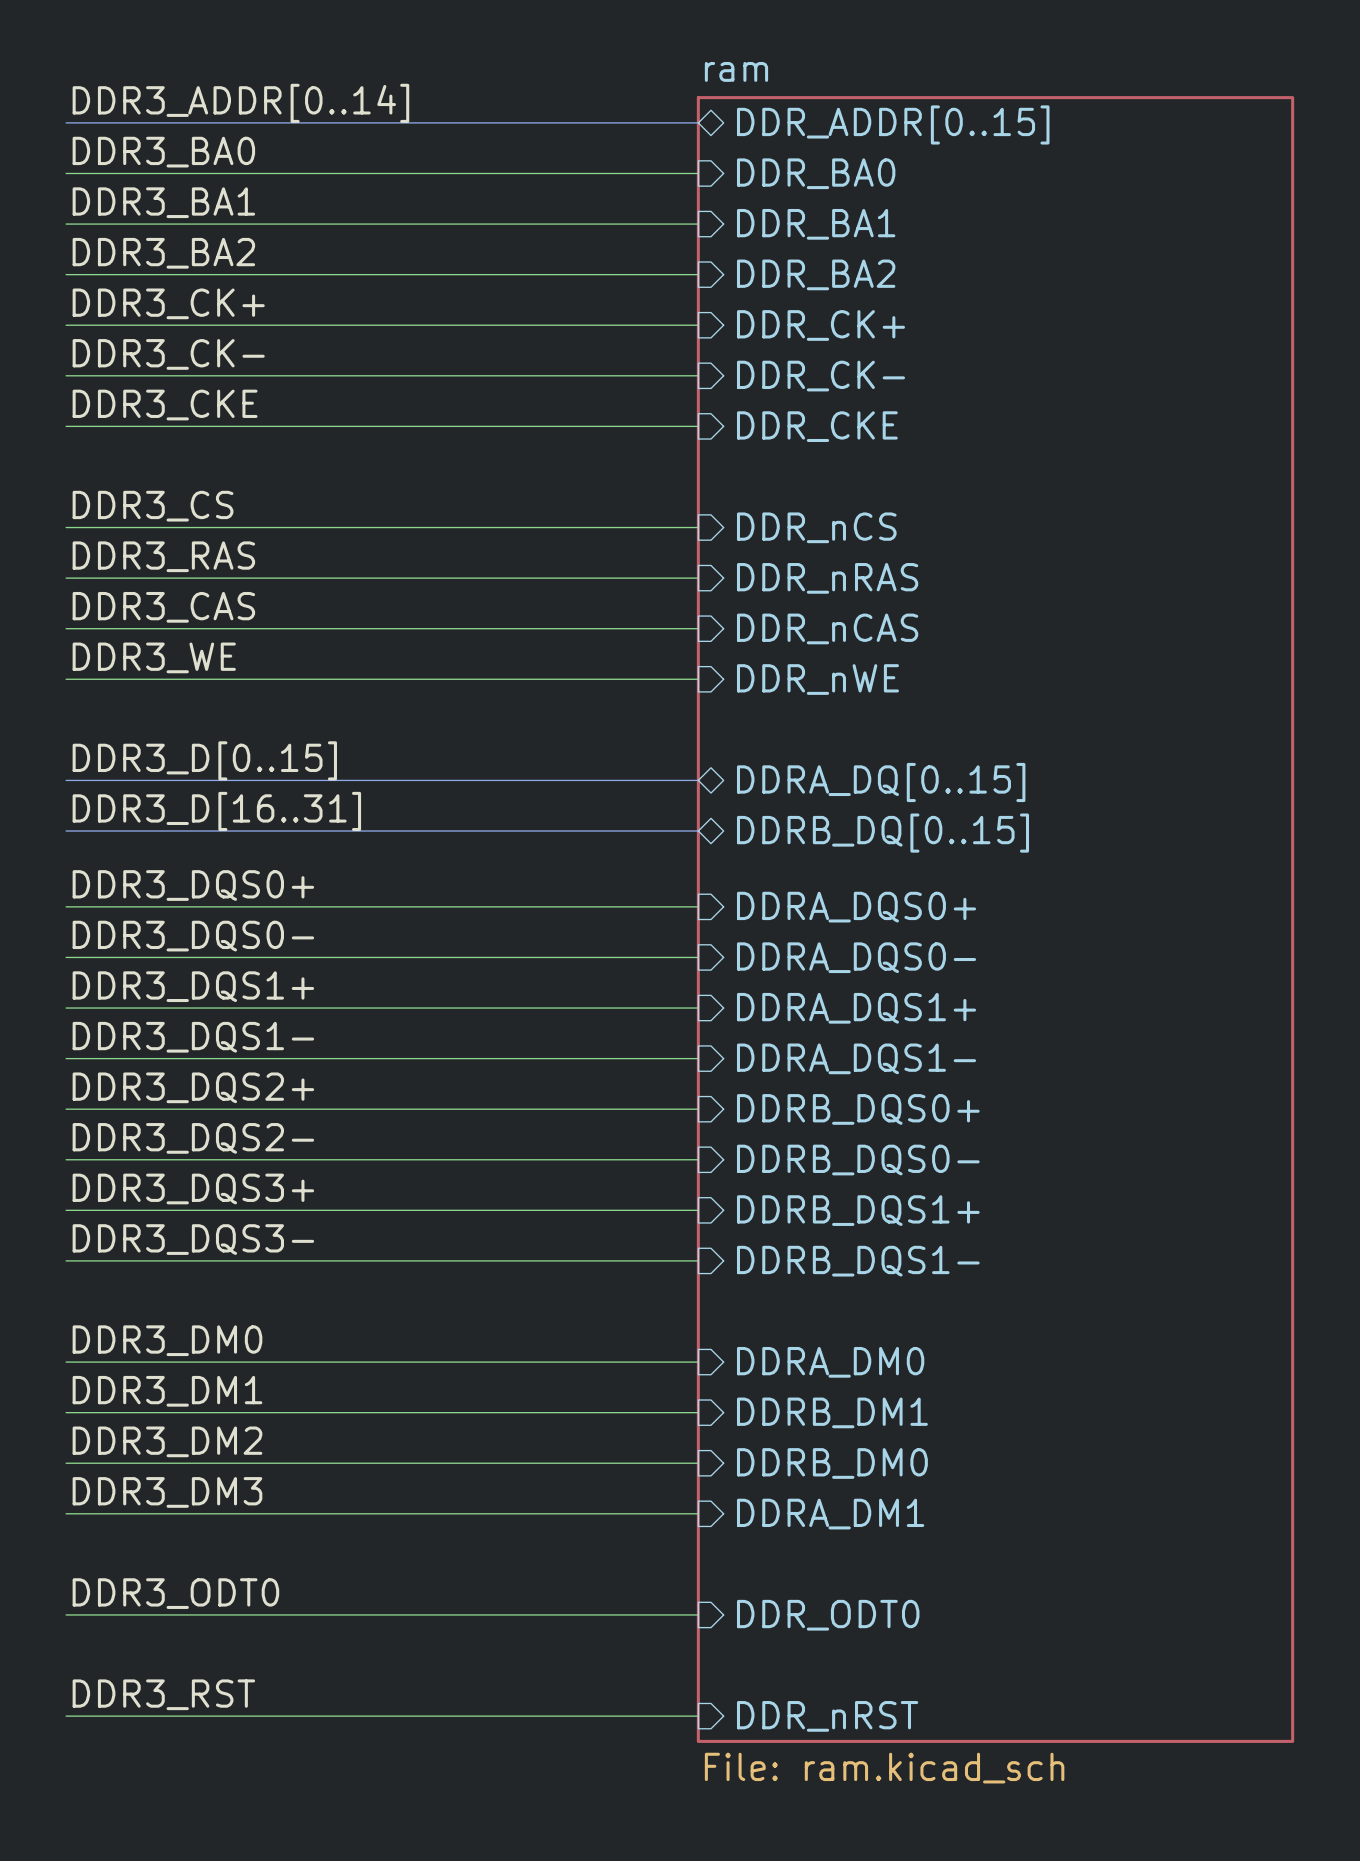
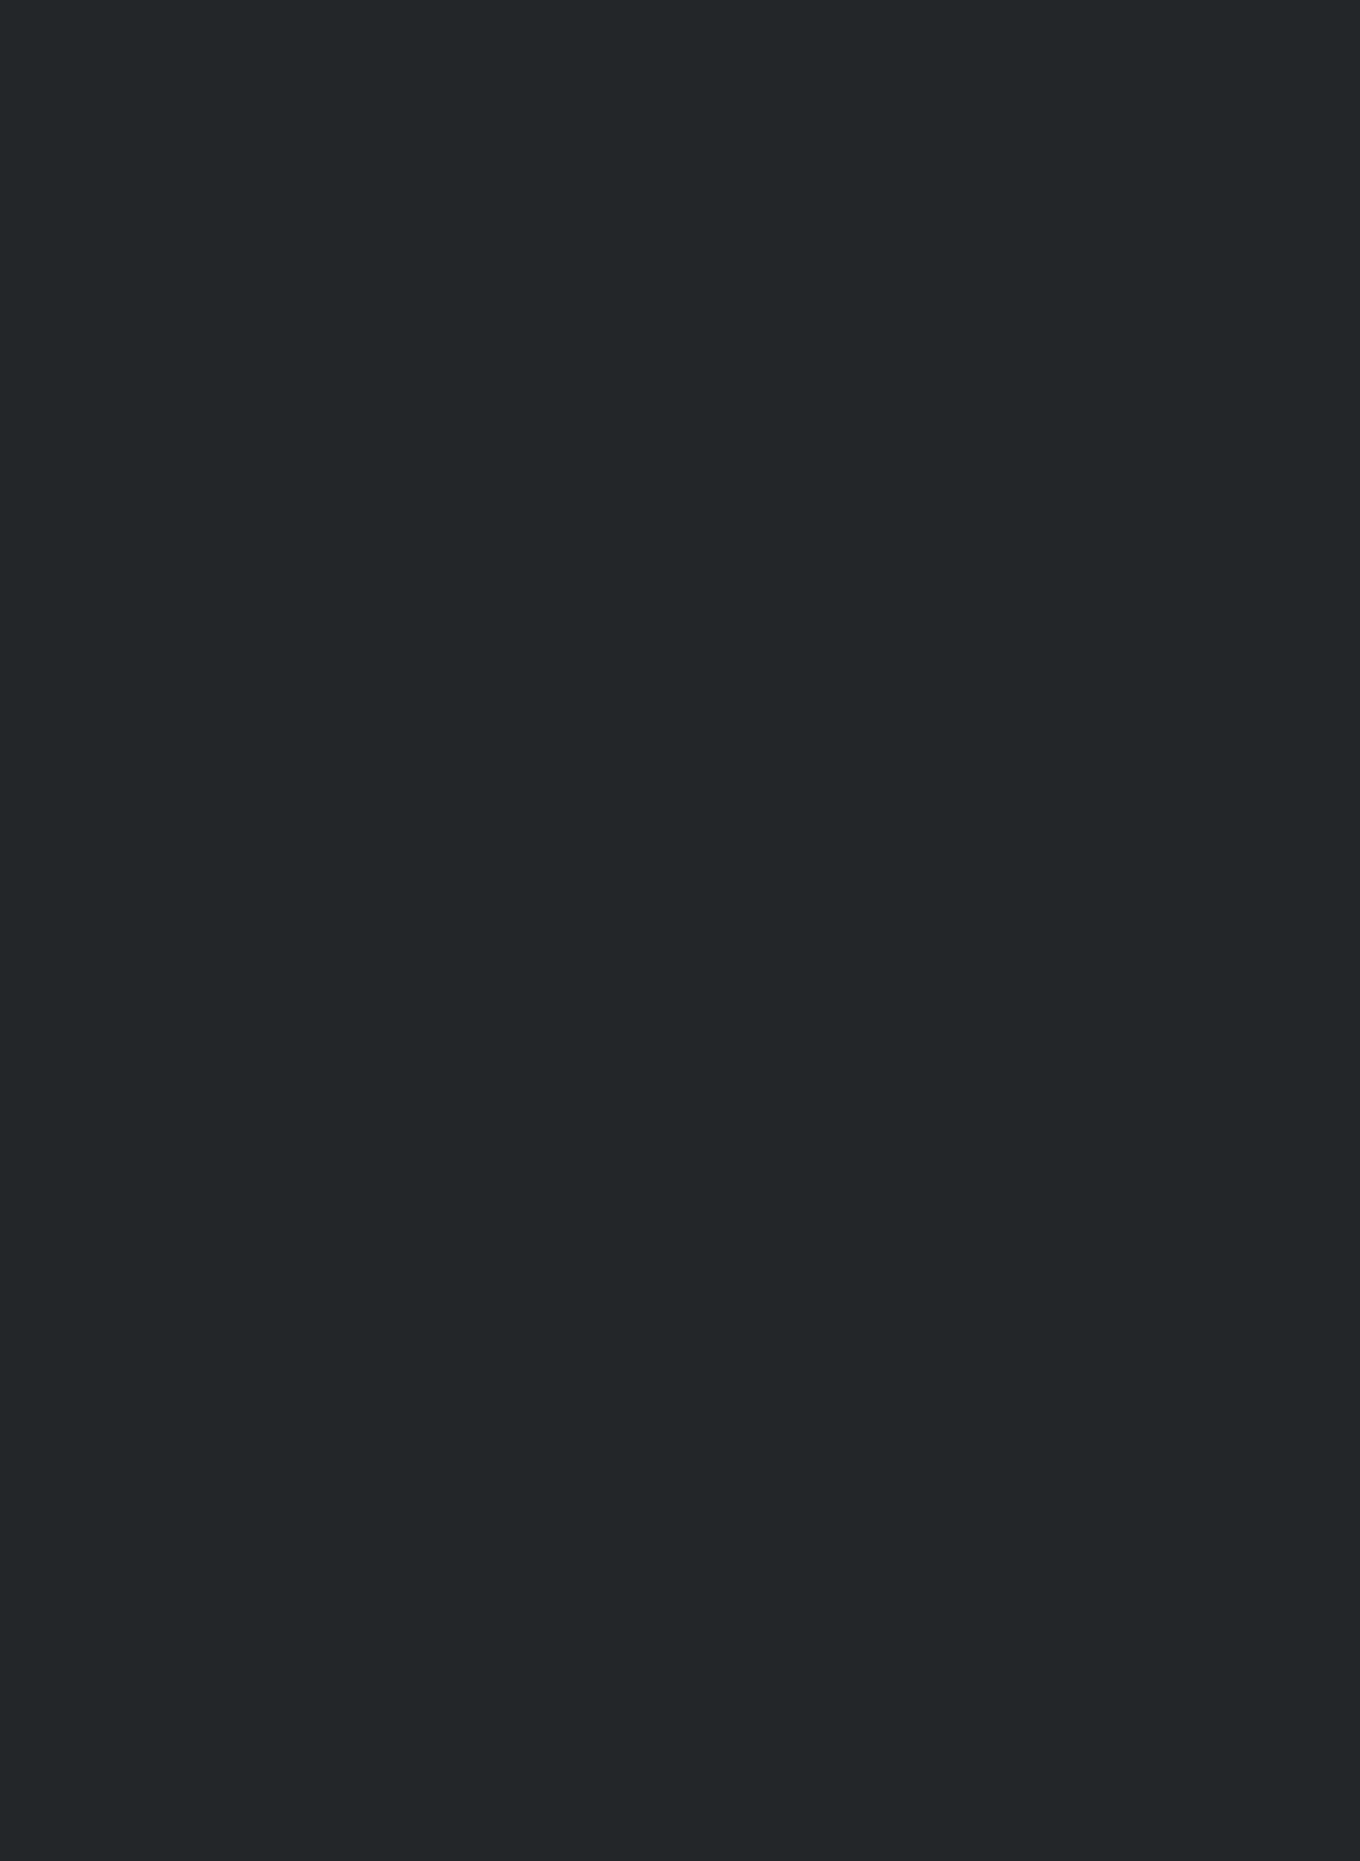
label: DDR3_ADDR[0..14] (240, 103) -> none
bus: (66, 122) (698, 122) -> none
sheet pin: DDR_ADDR[0..15] (893, 124) -> none
label: DDR3_BA0 (163, 152) -> none
wire: (66, 173) (698, 173) -> none
sheet pin: DDR_BA0 (816, 173) -> none
label: DDR3_BA1 (163, 202) -> none
wire: (66, 224) (698, 224) -> none
sheet pin: DDR_BA1 (816, 224) -> none
label: DDR3_BA2 (163, 253) -> none
wire: (66, 274) (698, 274) -> none
sheet pin: DDR_BA2 (816, 274) -> none
label: DDR3_CK+ (168, 303) -> none
wire: (66, 325) (698, 325) -> none
sheet pin: DDR_CK+ (820, 325) -> none
label: DDR3_CK- (168, 354) -> none
wire: (66, 375) (698, 375) -> none
sheet pin: DDR_CK- (820, 376) -> none
label: DDR3_CKE (165, 405) -> none
wire: (66, 426) (698, 426) -> none
sheet pin: DDR_CKE (817, 426) -> none
label: DDR3_CS (153, 506) -> none
wire: (66, 527) (698, 527) -> none
sheet pin: DDR_nCS (816, 527) -> none
label: DDR3_RAS (163, 556) -> none
wire: (66, 578) (698, 578) -> none
sheet pin: DDR_nRAS (827, 578) -> none
label: DDR3_CAS (163, 607) -> none
wire: (66, 628) (698, 628) -> none
sheet pin: DDR_nCAS (827, 628) -> none
label: DDR3_WE (154, 657) -> none
wire: (66, 679) (698, 679) -> none
sheet pin: DDR_nWE (817, 679) -> none
label: DDR3_D[0..15] (204, 760) -> none
bus: (66, 780) (698, 780) -> none
sheet pin: DDRA_DQ[0..15] (881, 782) -> none
label: DDR3_D[16..31] (216, 811) -> none
bus: (66, 831) (698, 831) -> none
sheet pin: DDRB_DQ[0..15] (883, 833) -> none
label: DDR3_DQS0+ (193, 885) -> none
wire: (66, 906) (698, 906) -> none
sheet pin: DDRA_DQS0+ (856, 907) -> none
sheet ram: File: ram.kicad_sch (995, 919) -> none
label: DDR3_DQS0- (193, 936) -> none
wire: (66, 957) (698, 957) -> none
sheet pin: DDRA_DQS0- (856, 957) -> none
label: DDR3_DQS1+ (193, 986) -> none
wire: (66, 1008) (698, 1008) -> none
sheet pin: DDRA_DQS1+ (856, 1008) -> none
label: DDR3_DQS1- (193, 1037) -> none
wire: (66, 1058) (698, 1058) -> none
sheet pin: DDRA_DQS1- (856, 1058) -> none
label: DDR3_DQS2+ (193, 1087) -> none
wire: (66, 1109) (698, 1109) -> none
sheet pin: DDRB_DQS0+ (858, 1109) -> none
label: DDR3_DQS2- (193, 1138) -> none
wire: (66, 1159) (698, 1159) -> none
sheet pin: DDRB_DQS0- (858, 1160) -> none
label: DDR3_DQS3+ (193, 1188) -> none
wire: (66, 1210) (698, 1210) -> none
sheet pin: DDRB_DQS1+ (858, 1210) -> none
label: DDR3_DQS3- (193, 1239) -> none
wire: (66, 1260) (698, 1260) -> none
sheet pin: DDRB_DQS1- (858, 1261) -> none
label: DDR3_DM0 (167, 1340) -> none
wire: (66, 1362) (698, 1362) -> none
sheet pin: DDRA_DM0 (830, 1362) -> none
label: DDR3_DM1 (167, 1391) -> none
wire: (66, 1412) (698, 1412) -> none
sheet pin: DDRB_DM1 (832, 1412) -> none
label: DDR3_DM2 (167, 1441) -> none
wire: (66, 1463) (698, 1463) -> none
sheet pin: DDRB_DM0 (832, 1463) -> none
label: DDR3_DM3 (167, 1492) -> none
wire: (66, 1513) (698, 1513) -> none
sheet pin: DDRA_DM1 (830, 1514) -> none
label: DDR3_ODT0 (175, 1593) -> none
wire: (66, 1614) (698, 1614) -> none
sheet pin: DDR_ODT0 (828, 1615) -> none
label: DDR3_RST (163, 1694) -> none
wire: (66, 1716) (698, 1716) -> none
sheet pin: DDR_nRST (827, 1716) -> none

